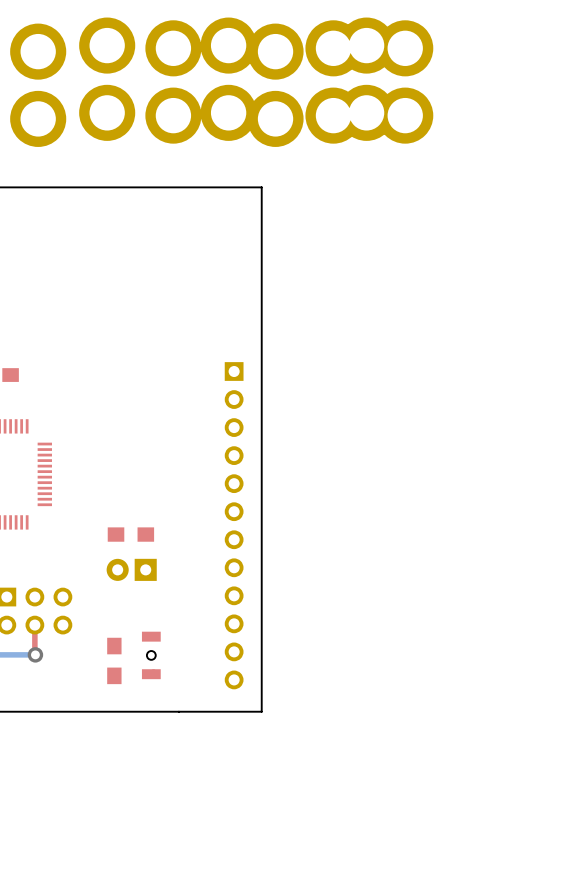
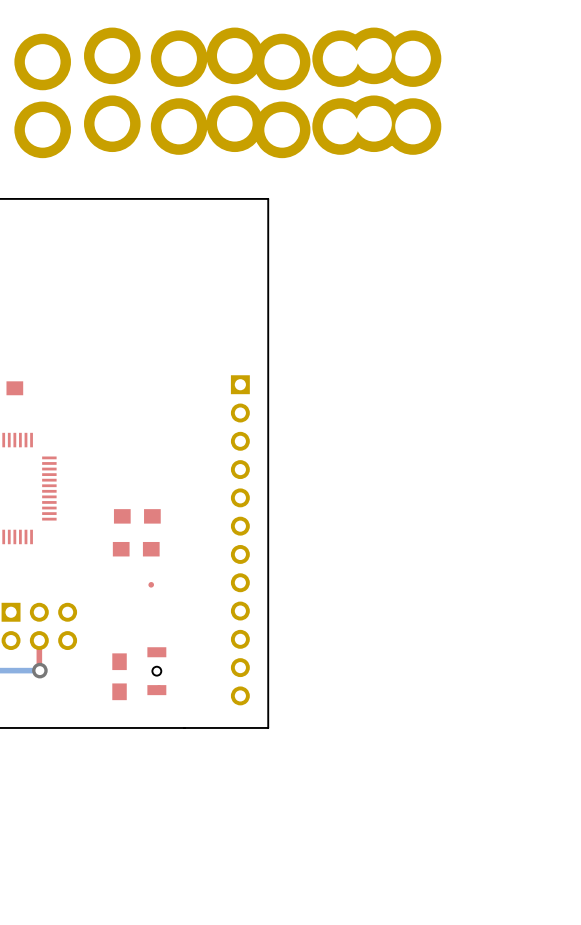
part: none -> (137, 516)
part: (131, 569) -> none

